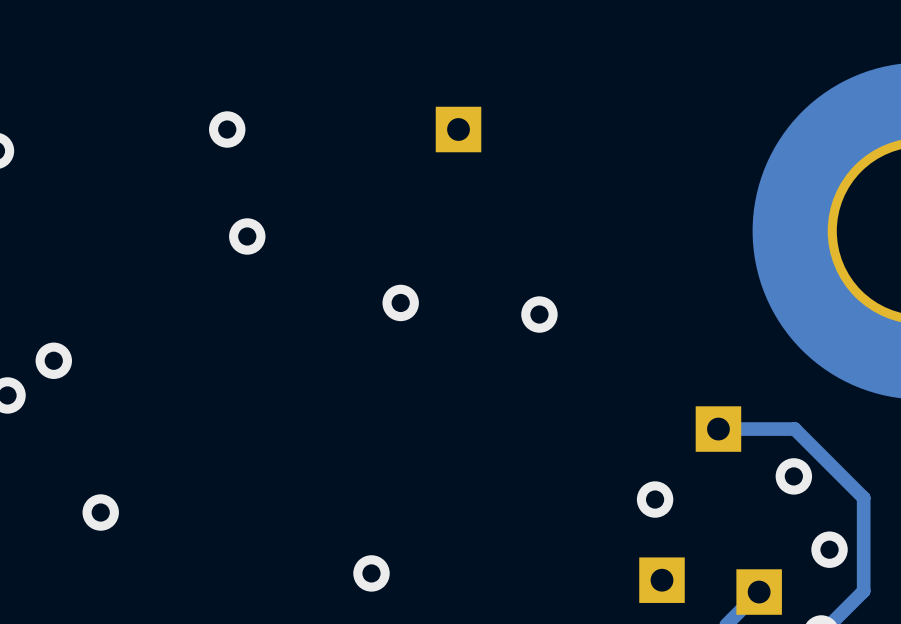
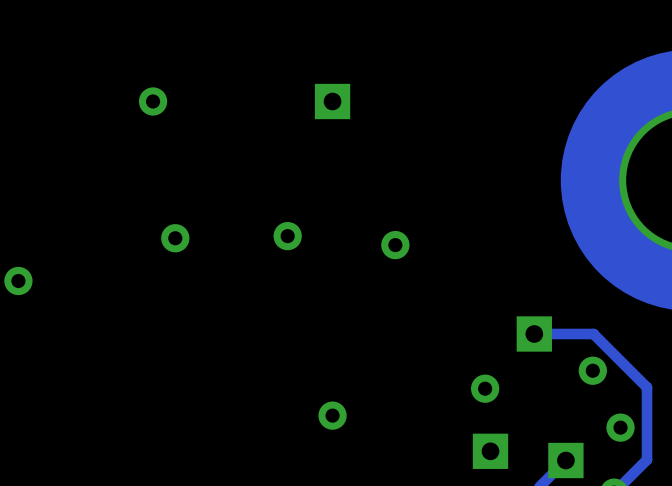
via position: (247, 236) -> (175, 238)
via: (100, 512) -> none
via position: (371, 573) -> (332, 415)

